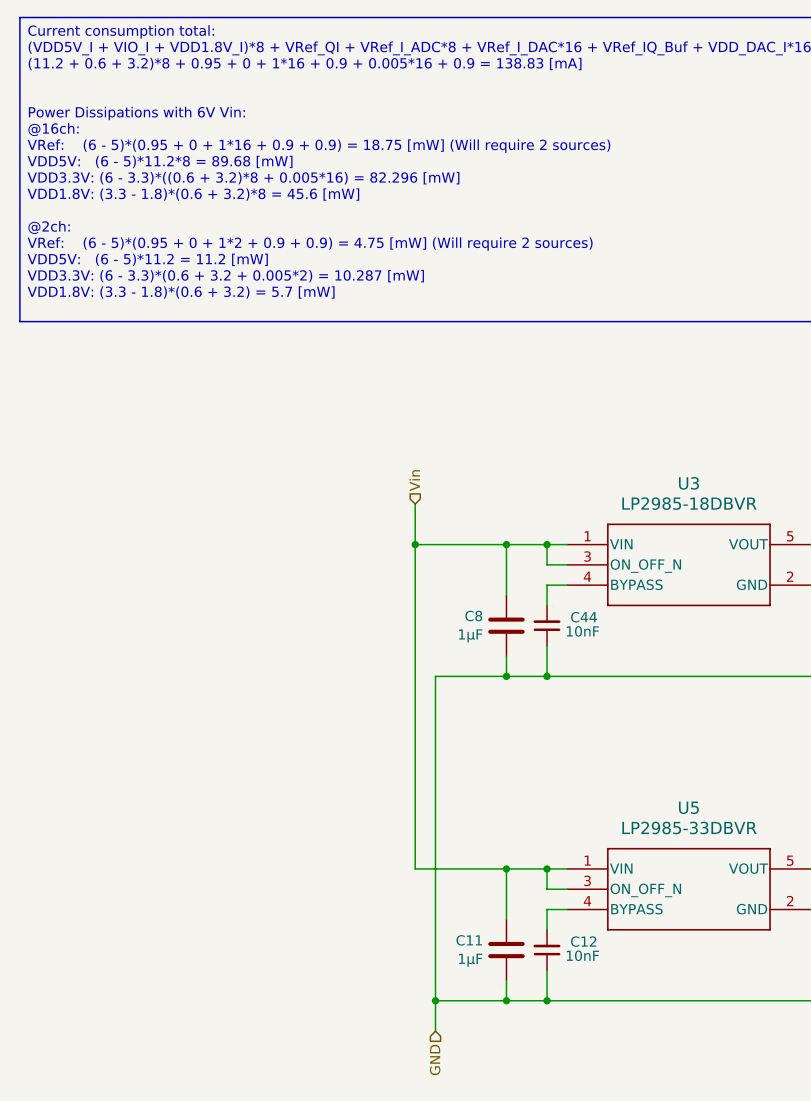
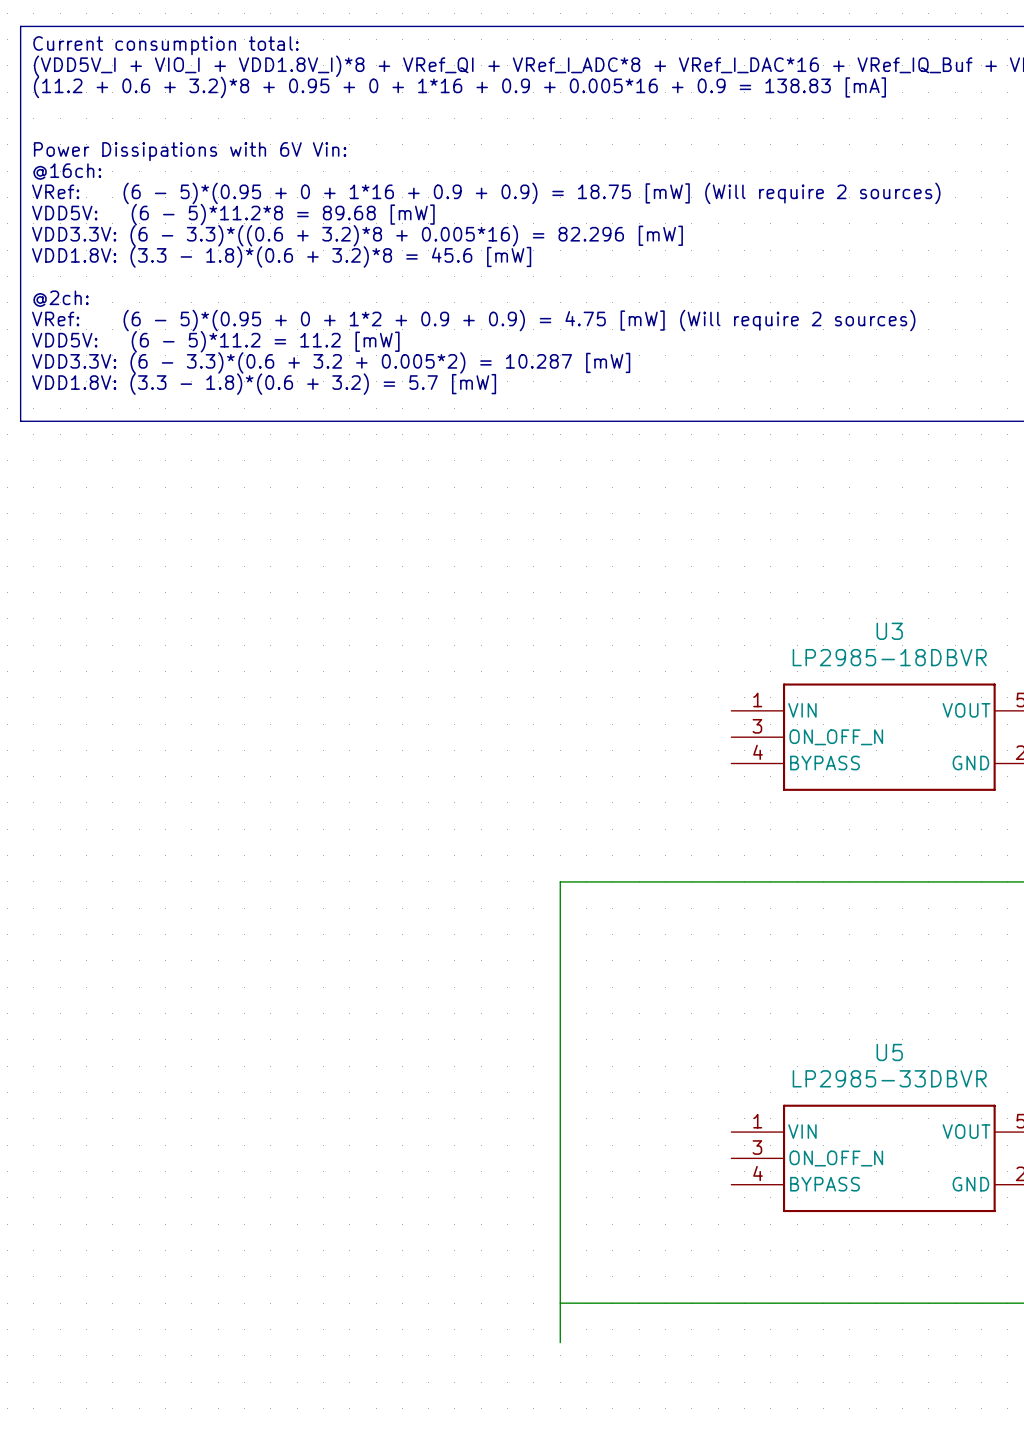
hierarchical label: Vin (414, 480) -> none
wire: (415, 504) (415, 868) (567, 868) -> none
wire: (415, 544) (567, 544) -> none
junction: (415, 544) -> none
wire: (506, 544) (506, 595) -> none
junction: (506, 544) -> none
wire: (547, 544) (547, 564) (567, 564) -> none
junction: (547, 544) -> none
wire: (567, 585) (547, 585) (547, 605) -> none
C8: 1µF (506, 625) -> none
C44: 10nF (547, 625) -> none
wire: (547, 645) (547, 676) -> none
wire: (506, 656) (506, 676) -> none
junction: (506, 676) -> none
junction: (547, 676) -> none
wire: (506, 868) (506, 919) -> none
junction: (506, 868) -> none
wire: (547, 868) (547, 889) (567, 889) -> none
junction: (547, 868) -> none
wire: (567, 909) (547, 909) (547, 929) -> none
C11: 1µF (506, 950) -> none
C12: 10nF (547, 950) -> none
wire: (547, 970) (547, 1000) -> none
wire: (506, 980) (506, 1000) -> none
junction: (435, 1000) -> none
junction: (506, 1000) -> none
junction: (547, 1000) -> none
hierarchical label: GND (435, 1059) -> none

